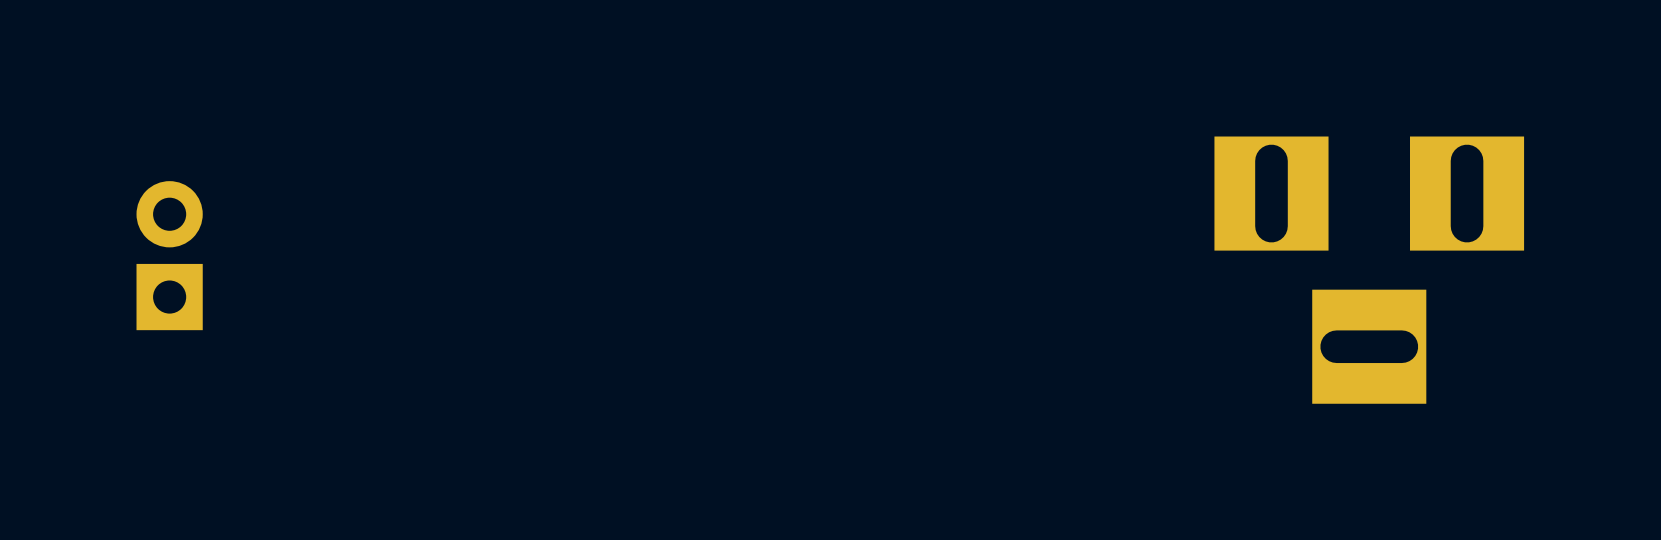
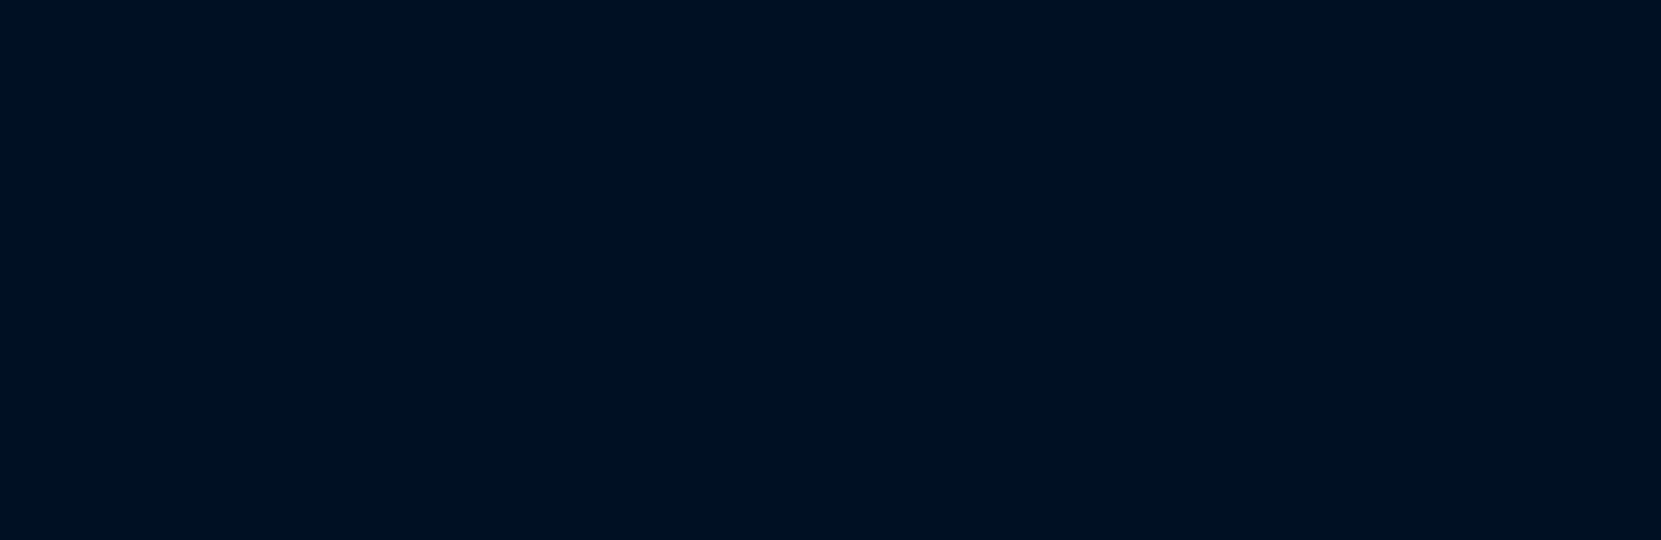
part: (169, 255) -> none
part: (1369, 270) -> none

